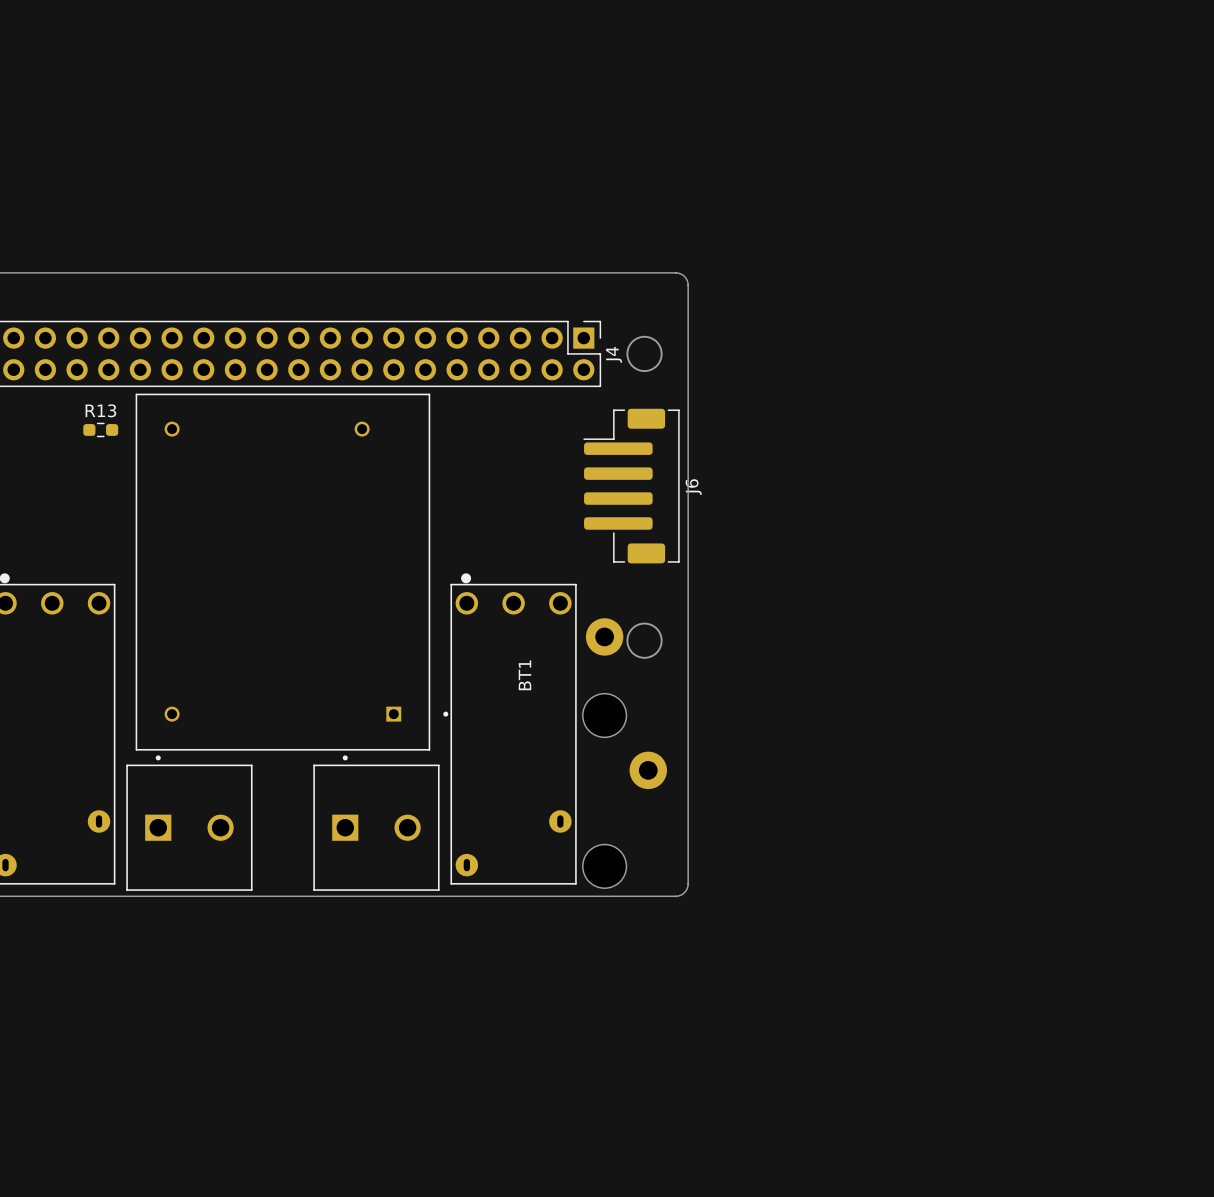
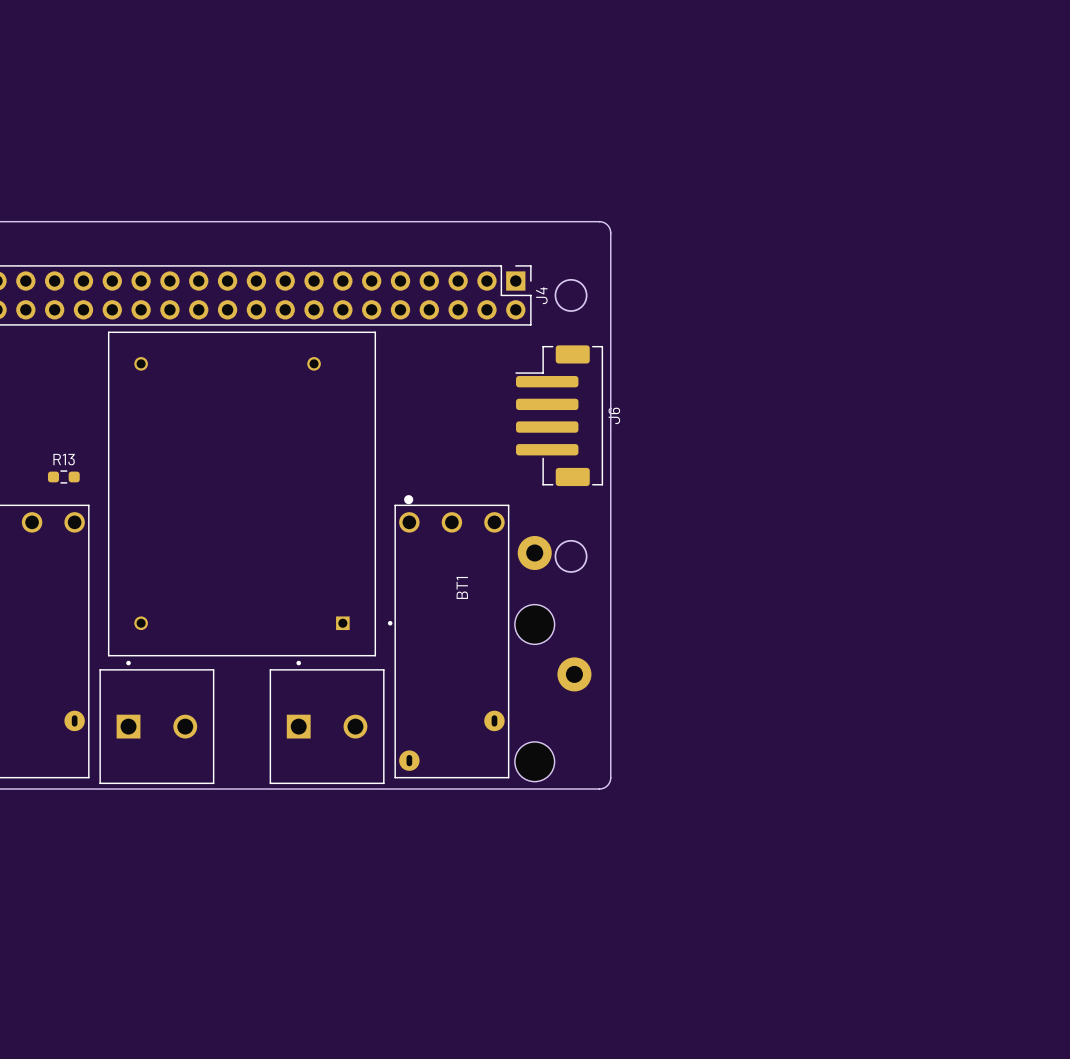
R13 position: (100, 429) -> (63, 476)

